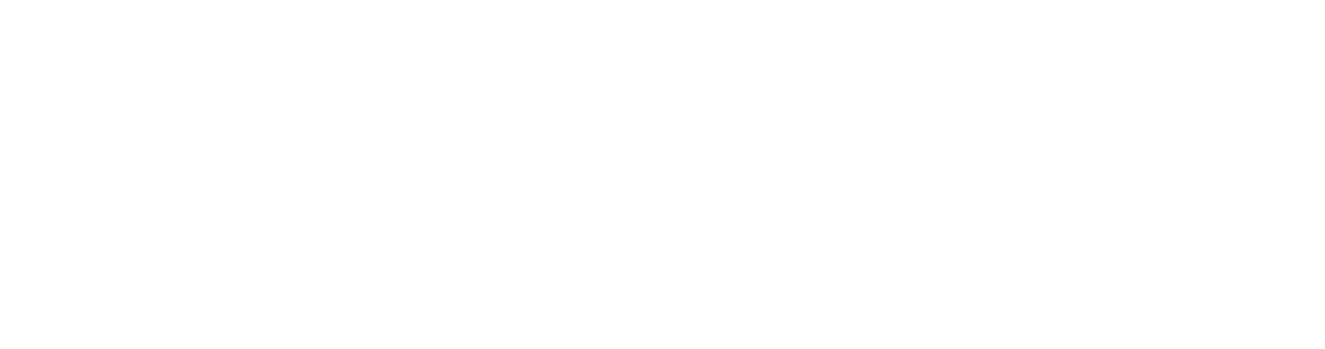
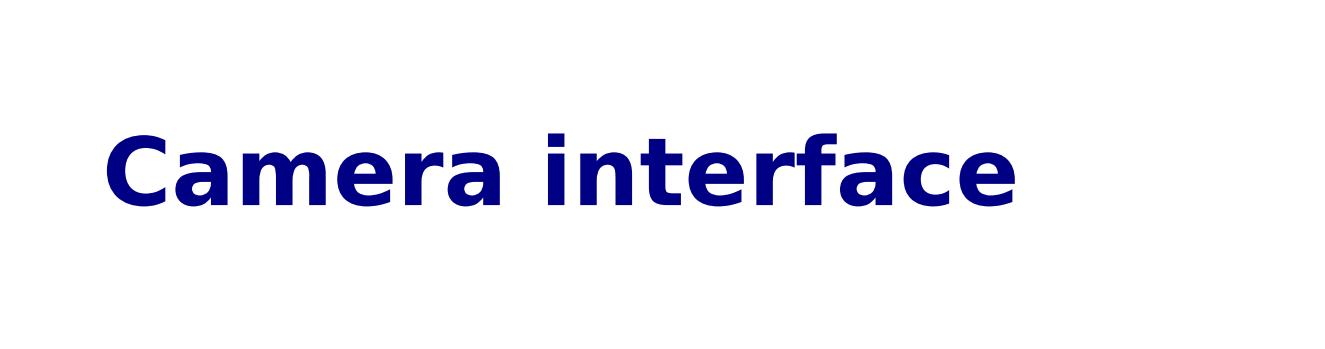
text: none -> Camera interface (560, 169)

